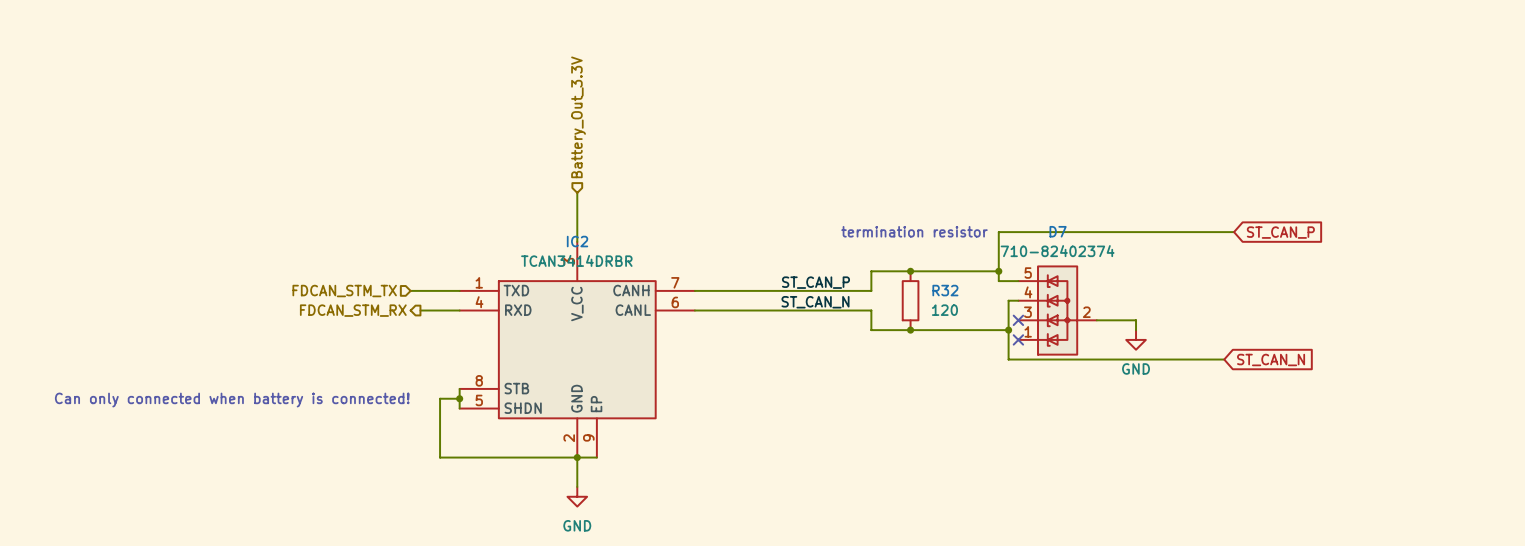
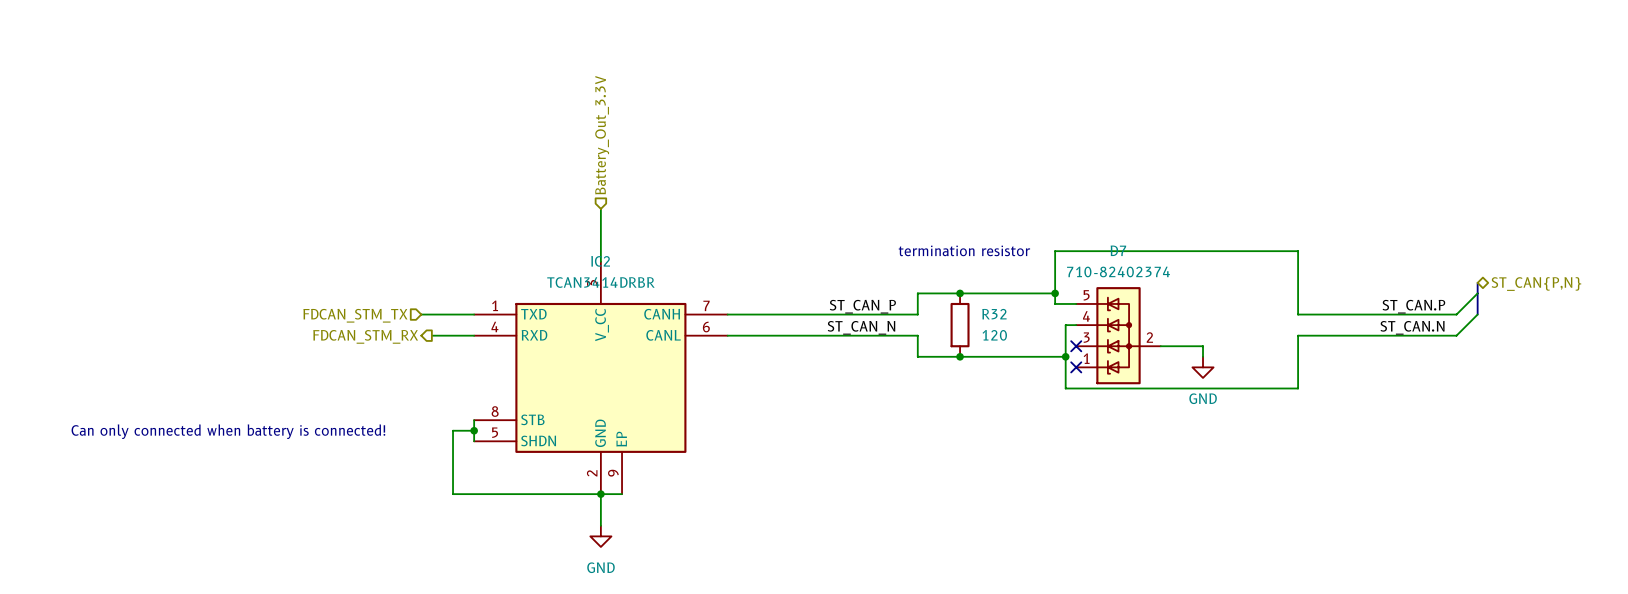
wire: (1224, 232) (1234, 232) -> (1298, 251) (1298, 314) (1456, 314) (1477, 293)
global label: ST_CAN_P (1280, 232) -> none
bus: none -> (1477, 282) (1477, 314)
hierarchical label: none -> ST_CAN{P,N} (1536, 284)
label: none -> ST_CAN.P (1413, 306)
wire: none -> (1477, 314) (1456, 335) (1298, 335) (1298, 388)
label: none -> ST_CAN.N (1412, 327)
global label: ST_CAN_N (1271, 360) -> none

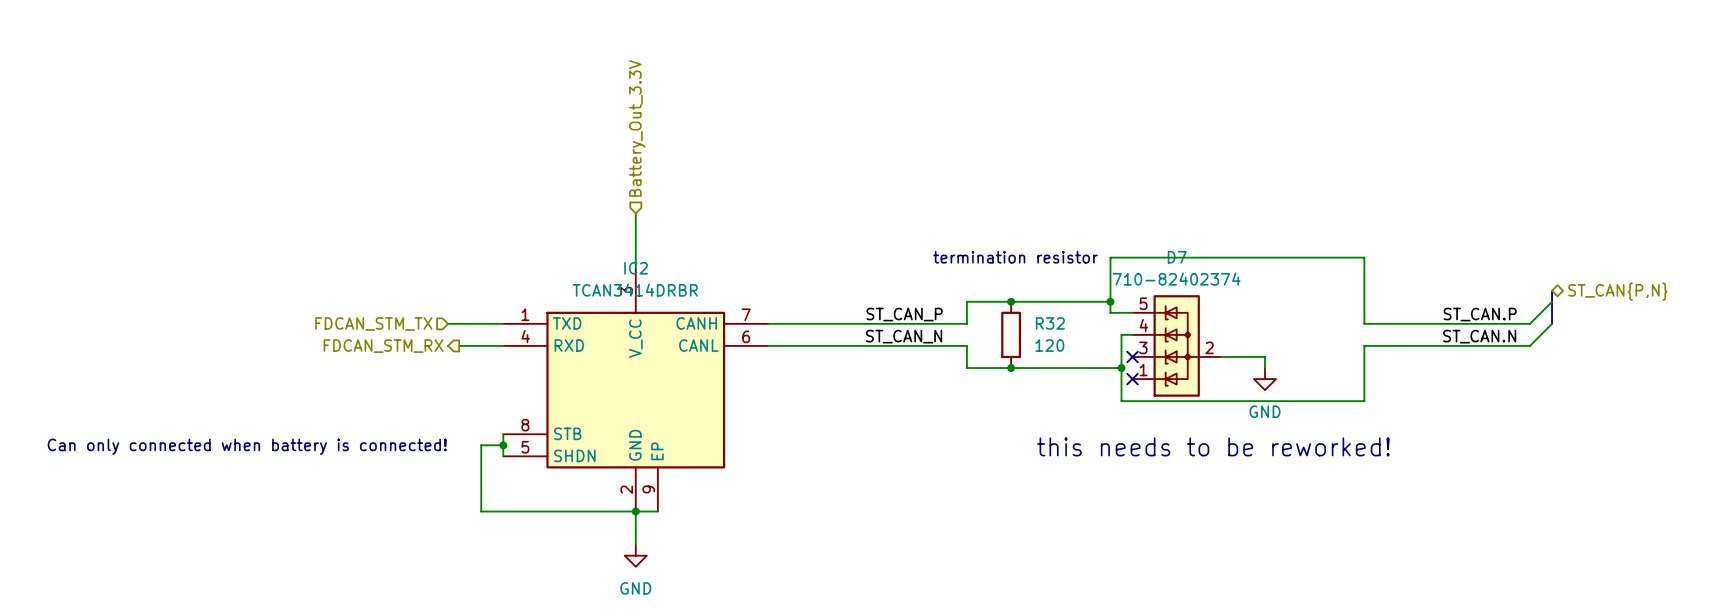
text: none -> this needs to be reworked! (1213, 446)

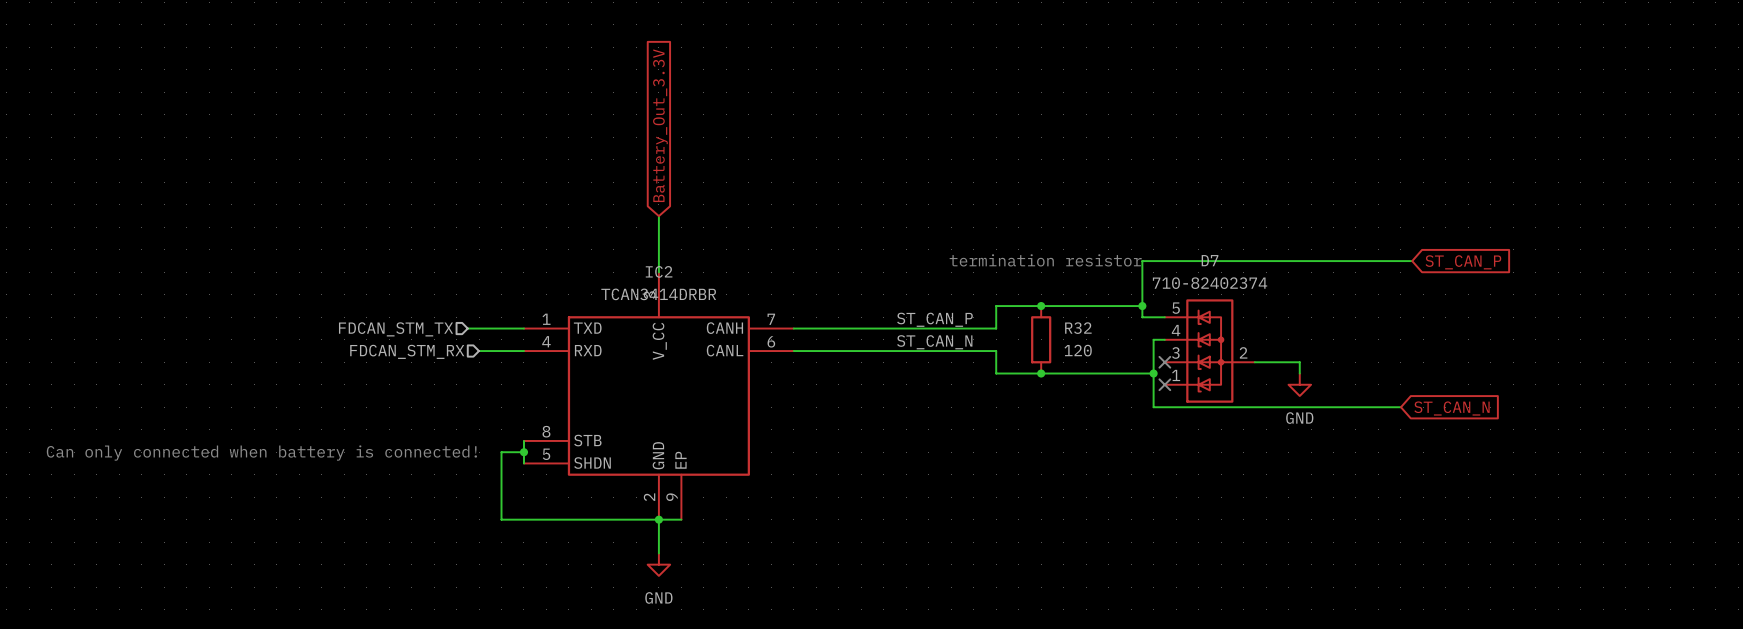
hierarchical label: Battery_Out_3.3V (637, 128) -> none
global label: none -> Battery_Out_3.3V (660, 125)
wire: (1364, 257) (1364, 323) (1529, 323) (1552, 301) -> (1400, 261) (1412, 261)
global label: none -> ST_CAN_P (1463, 262)
bus: (1552, 290) (1552, 323) -> none
hierarchical label: ST_CAN{P,N} (1617, 291) -> none
label: ST_CAN.P (1480, 314) -> none
wire: (1552, 323) (1529, 345) (1364, 345) (1364, 401) -> none
label: ST_CAN.N (1479, 336) -> none
hierarchical label shape: output (383, 346) -> input (407, 351)
global label: none -> ST_CAN_N (1451, 408)
text: this needs to be reworked! (1213, 446) -> none

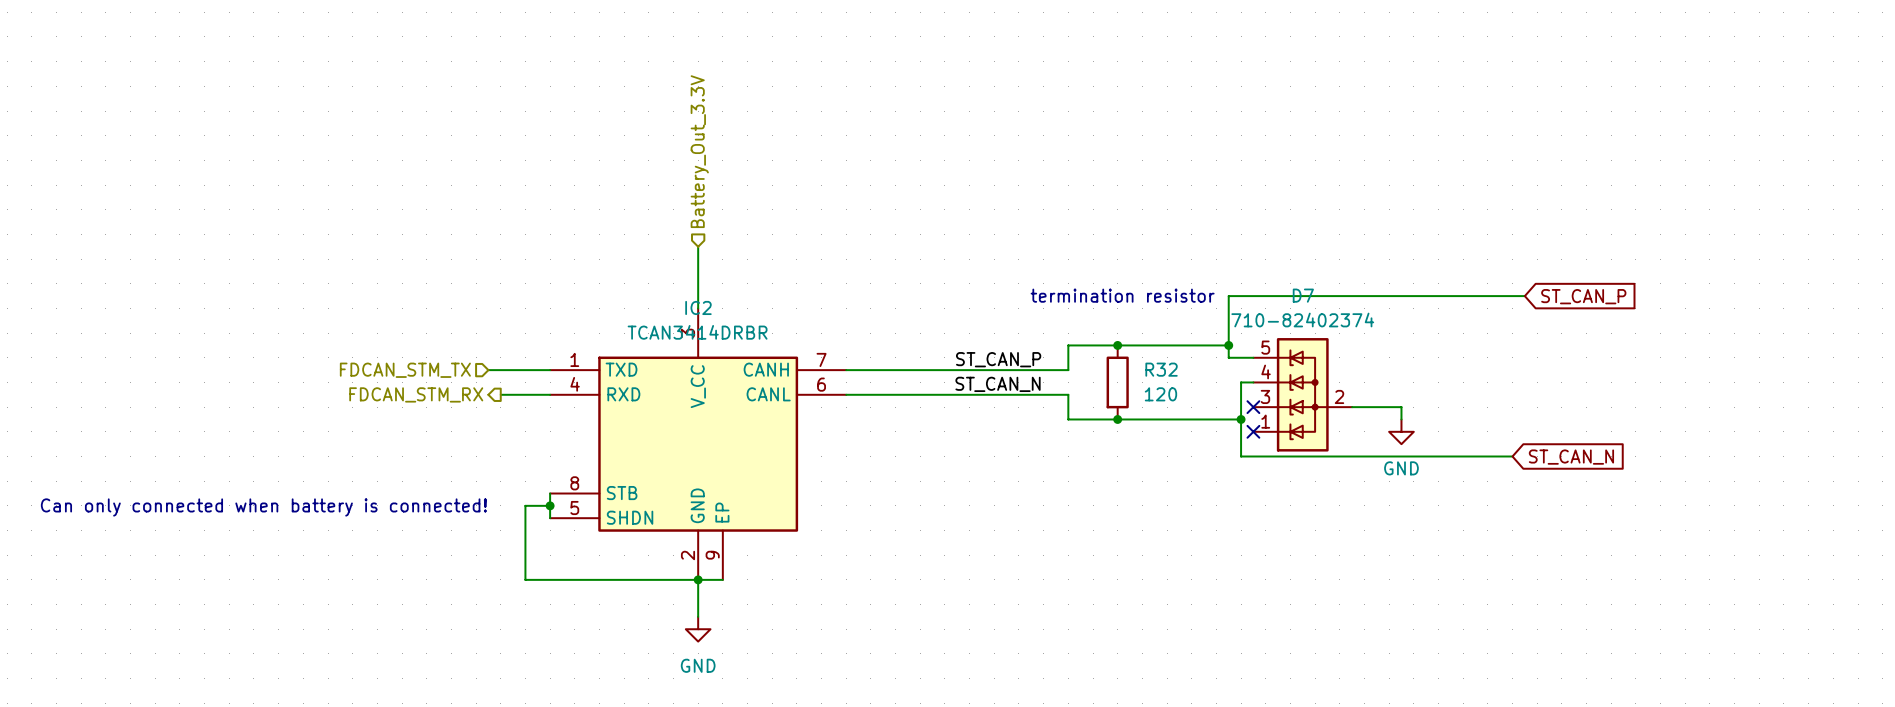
hierarchical label: none -> Battery_Out_3.3V (699, 151)
global label: Battery_Out_3.3V (660, 125) -> none
hierarchical label shape: input (407, 351) -> output (416, 394)

